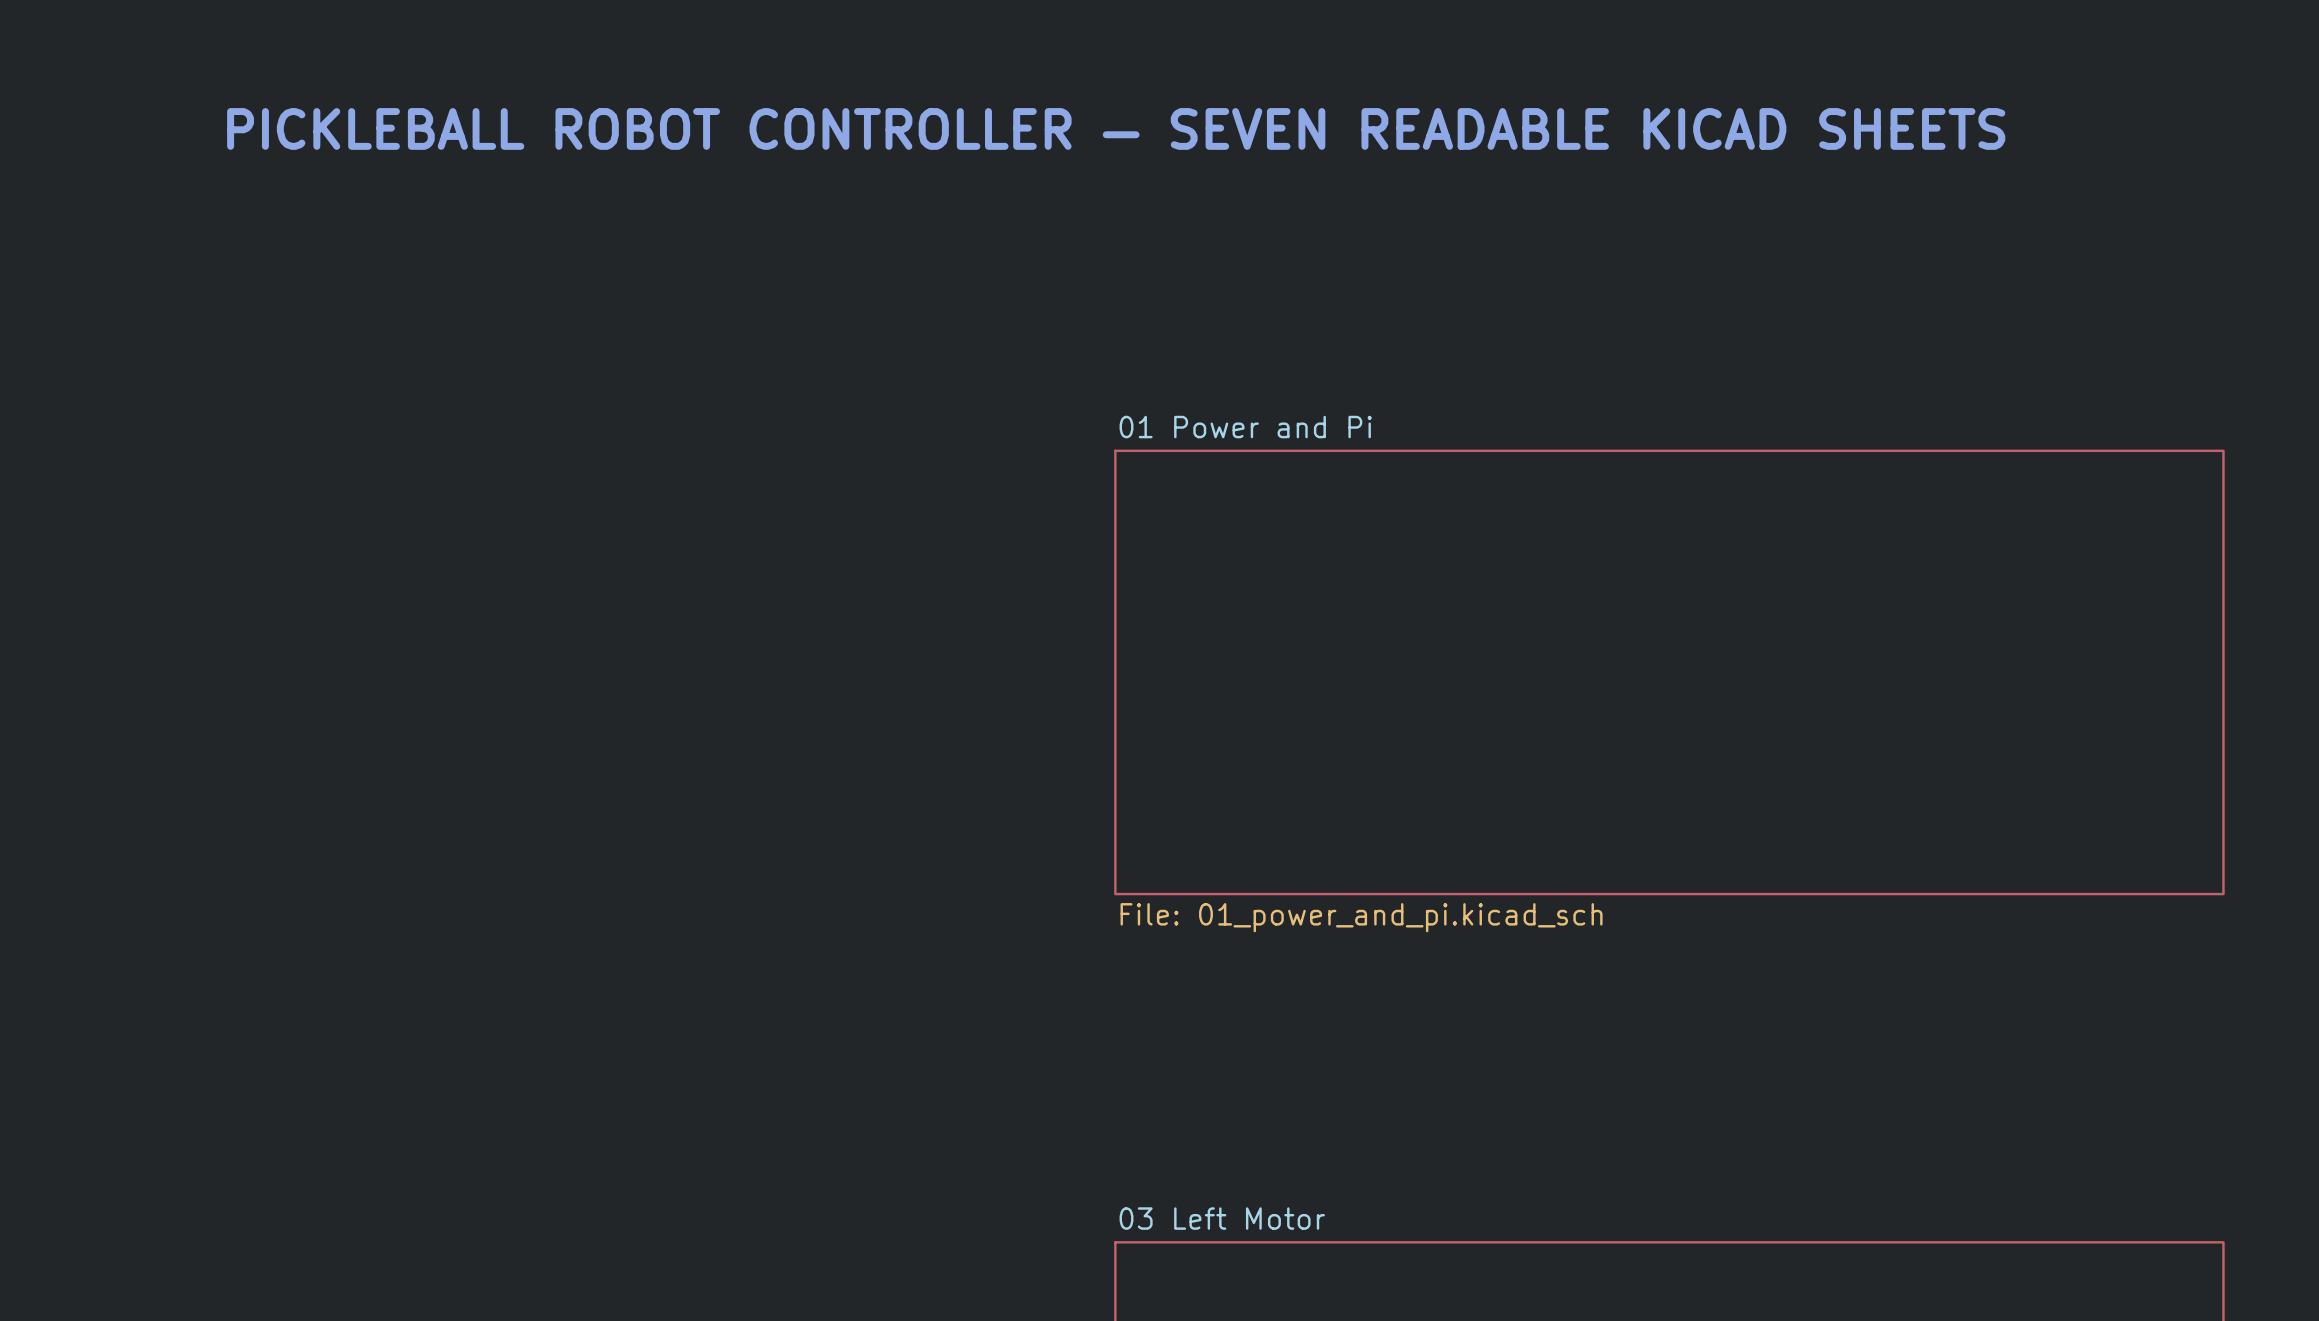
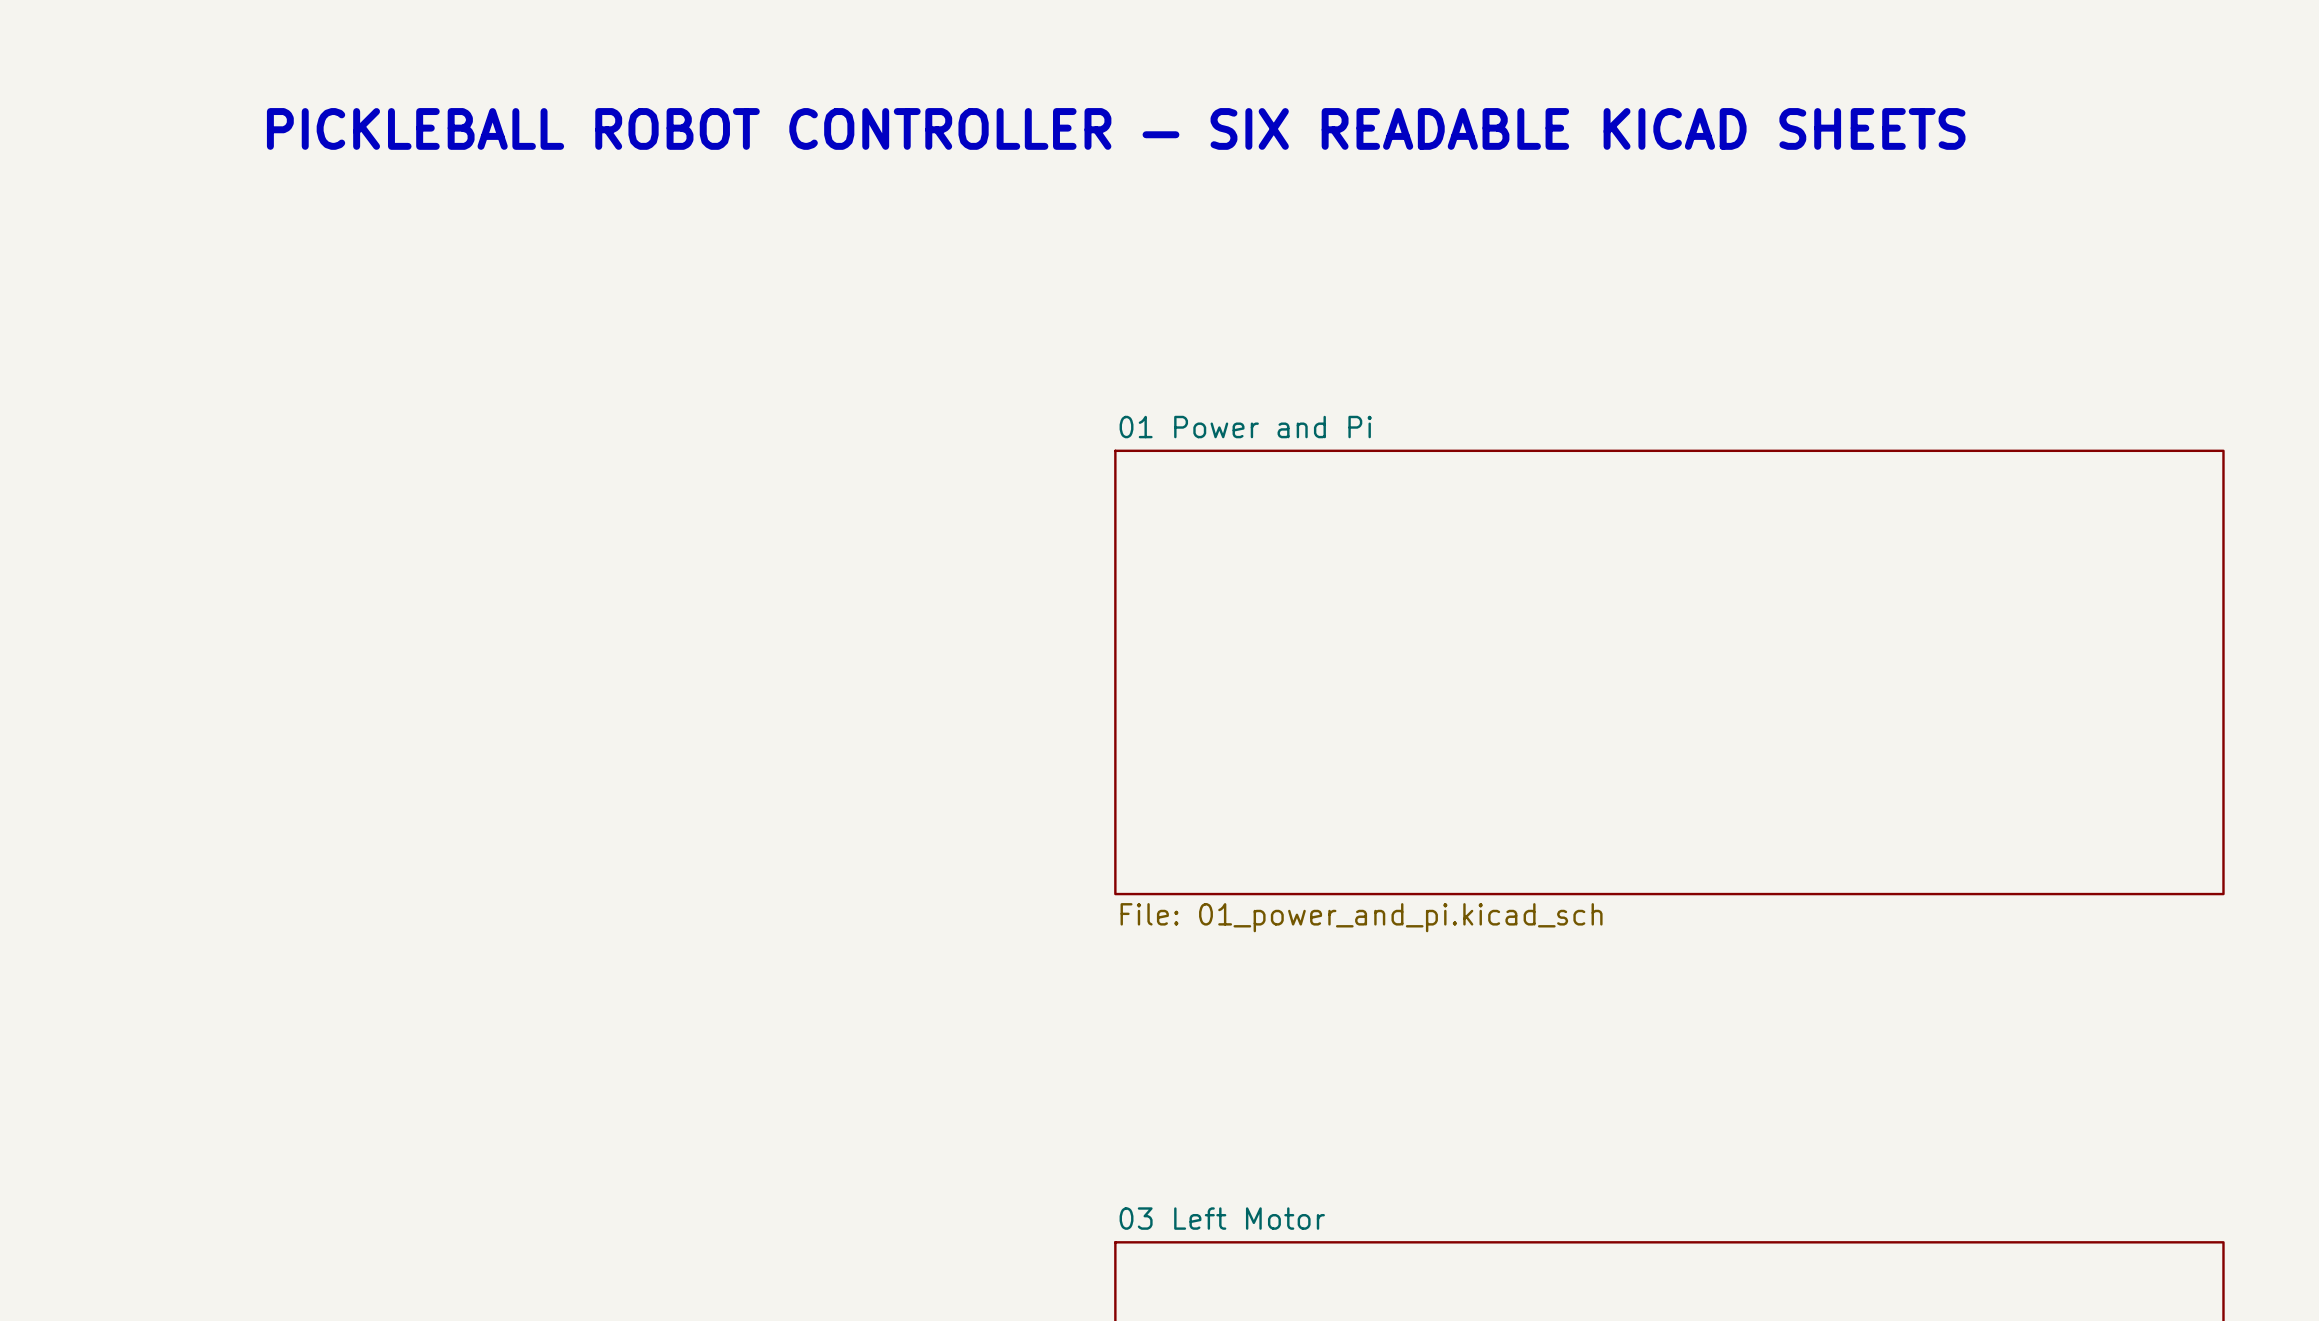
text: PICKLEBALL ROBOT CONTROLLER — SEVEN READABLE KICAD SHEETS (1116, 128) -> PICKLEBALL ROBOT CONTROLLER — SIX READABLE KICAD SHEETS (1116, 128)

